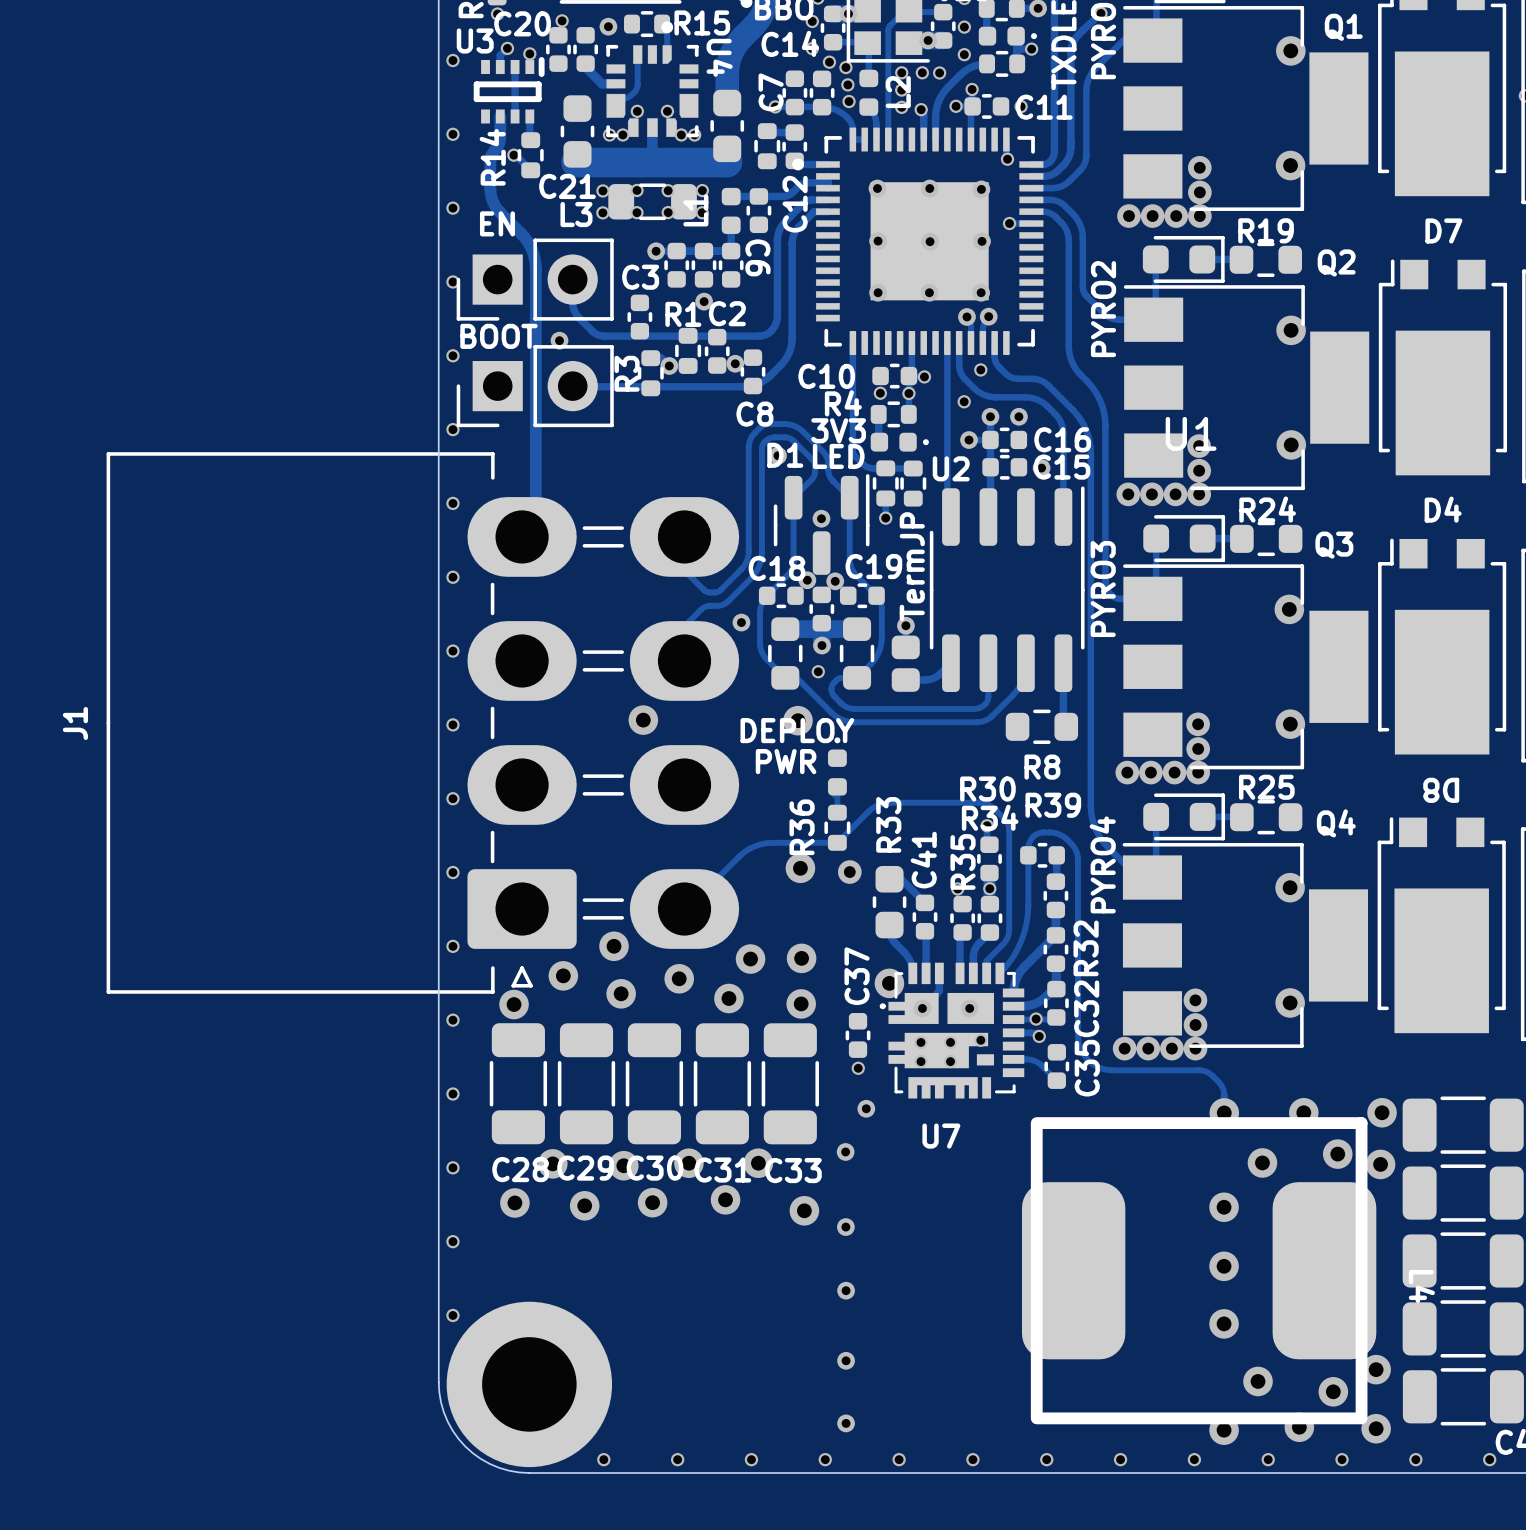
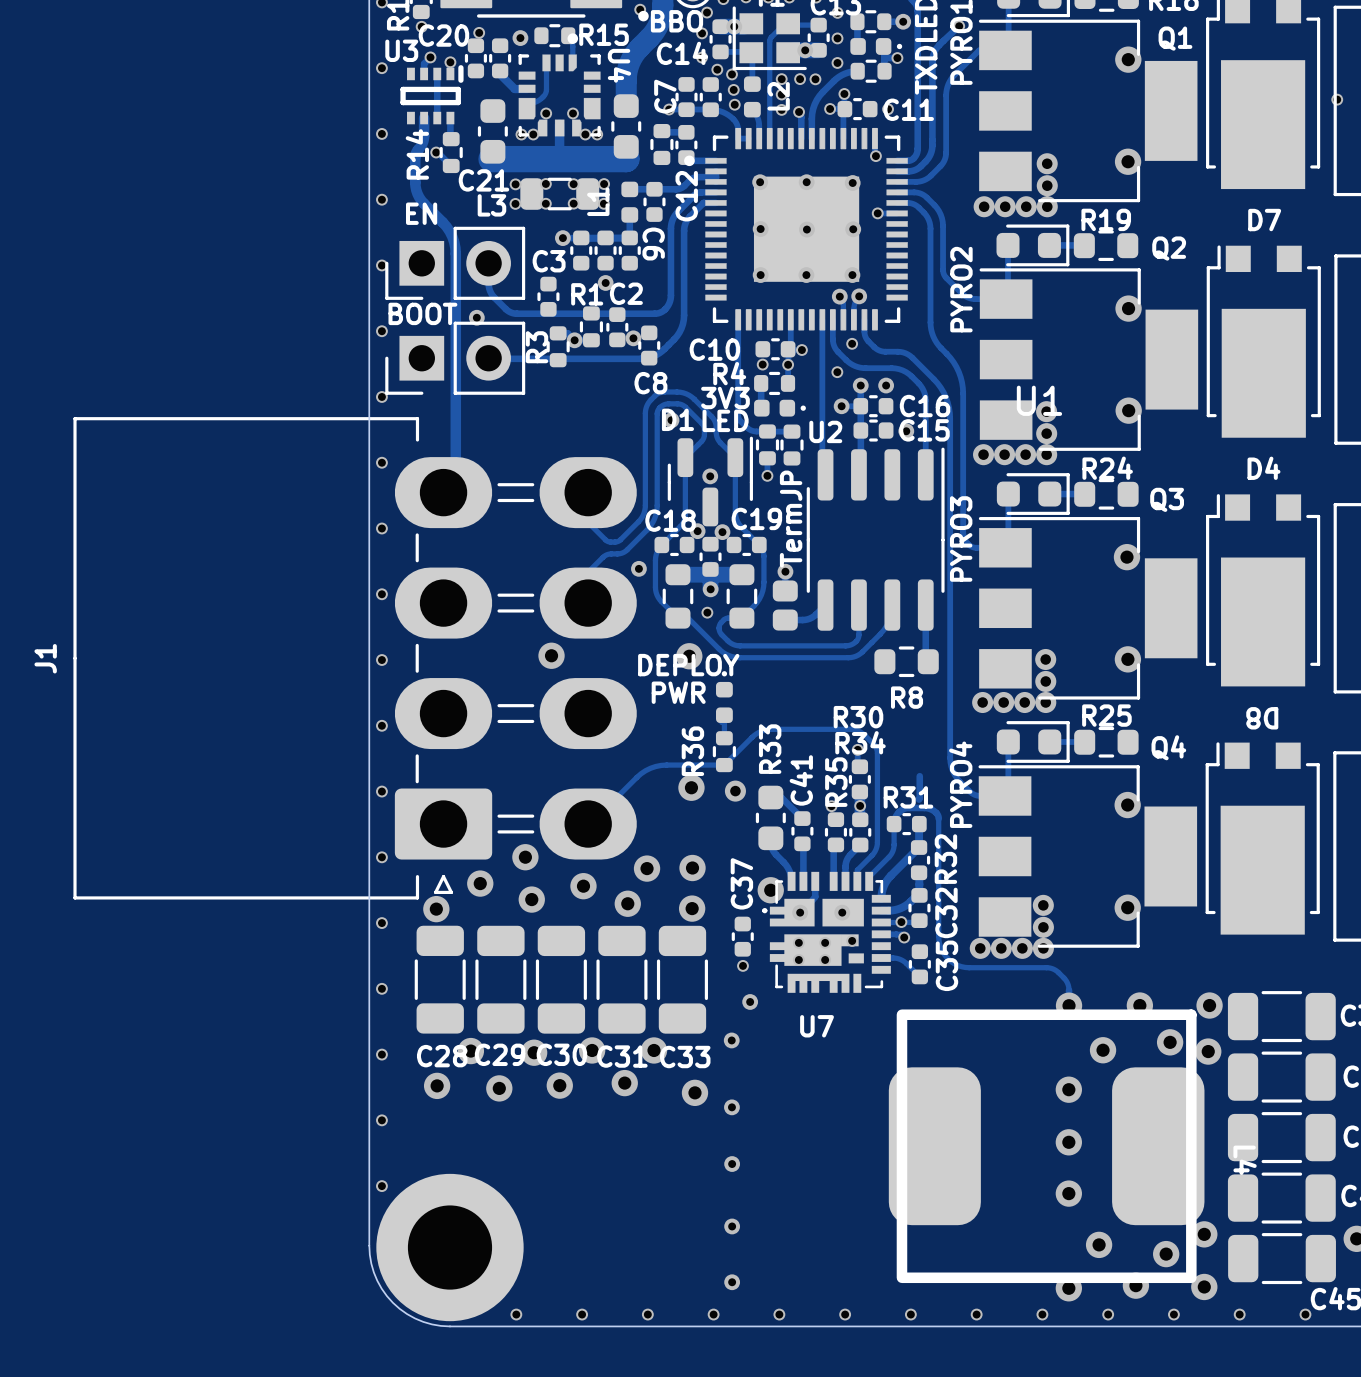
track: (1090, 805) (1092, 821) (1102, 841) (1133, 871) (1152, 877) -> (950, 732) (950, 762) (957, 778) (974, 794) (1005, 795)
R39: (1042, 855) -> none
part: (1055, 895) -> none
track: (1077, 902) (1077, 857) (1074, 847) (1065, 838) (1056, 833) (1042, 832) (1035, 834) (1028, 846) (1027, 914) (1024, 932) (1011, 958) (999, 973) -> (938, 818) (936, 812) (927, 808) (907, 808) (900, 810) (894, 820) (892, 852) (869, 876)
R31: none -> (906, 824)

